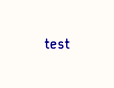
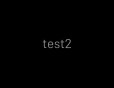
text: test (57, 43) -> test2 (56, 43)

